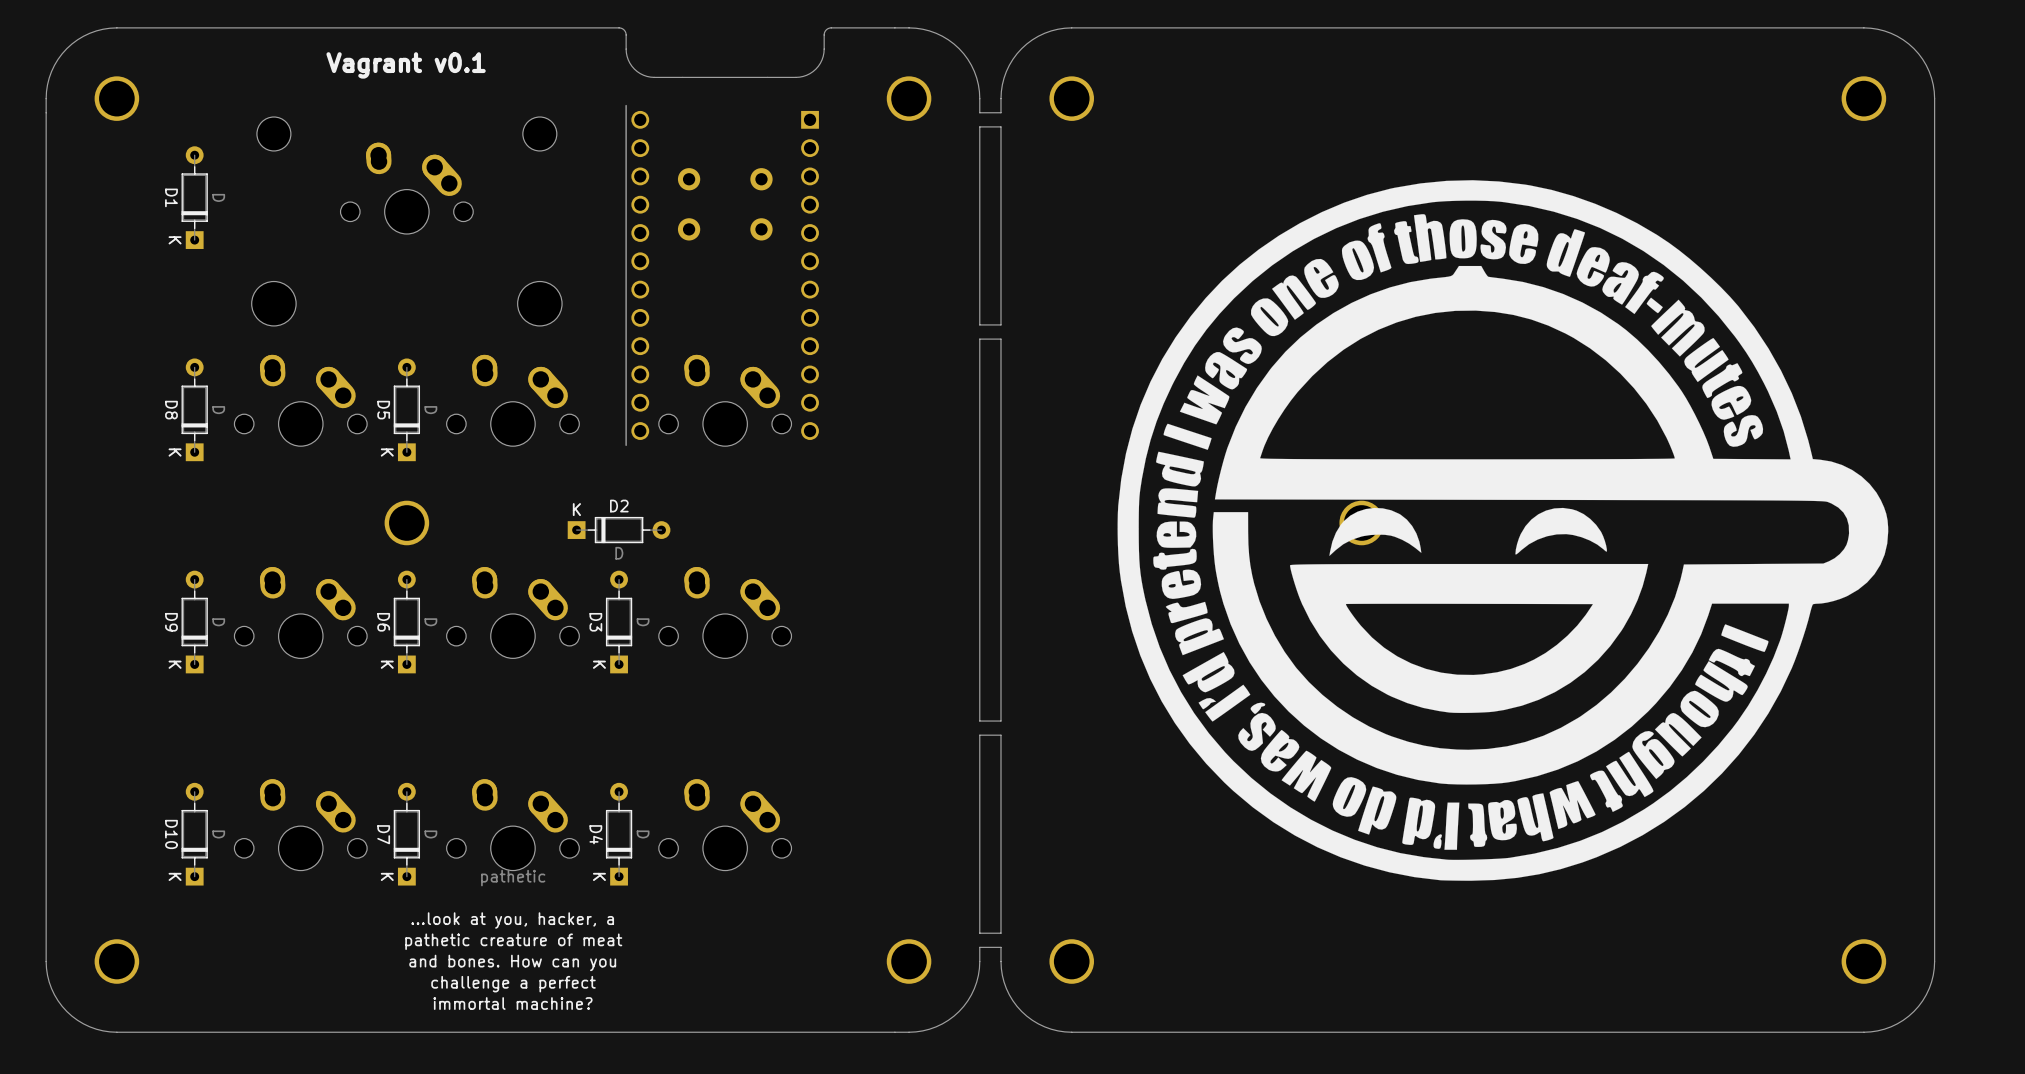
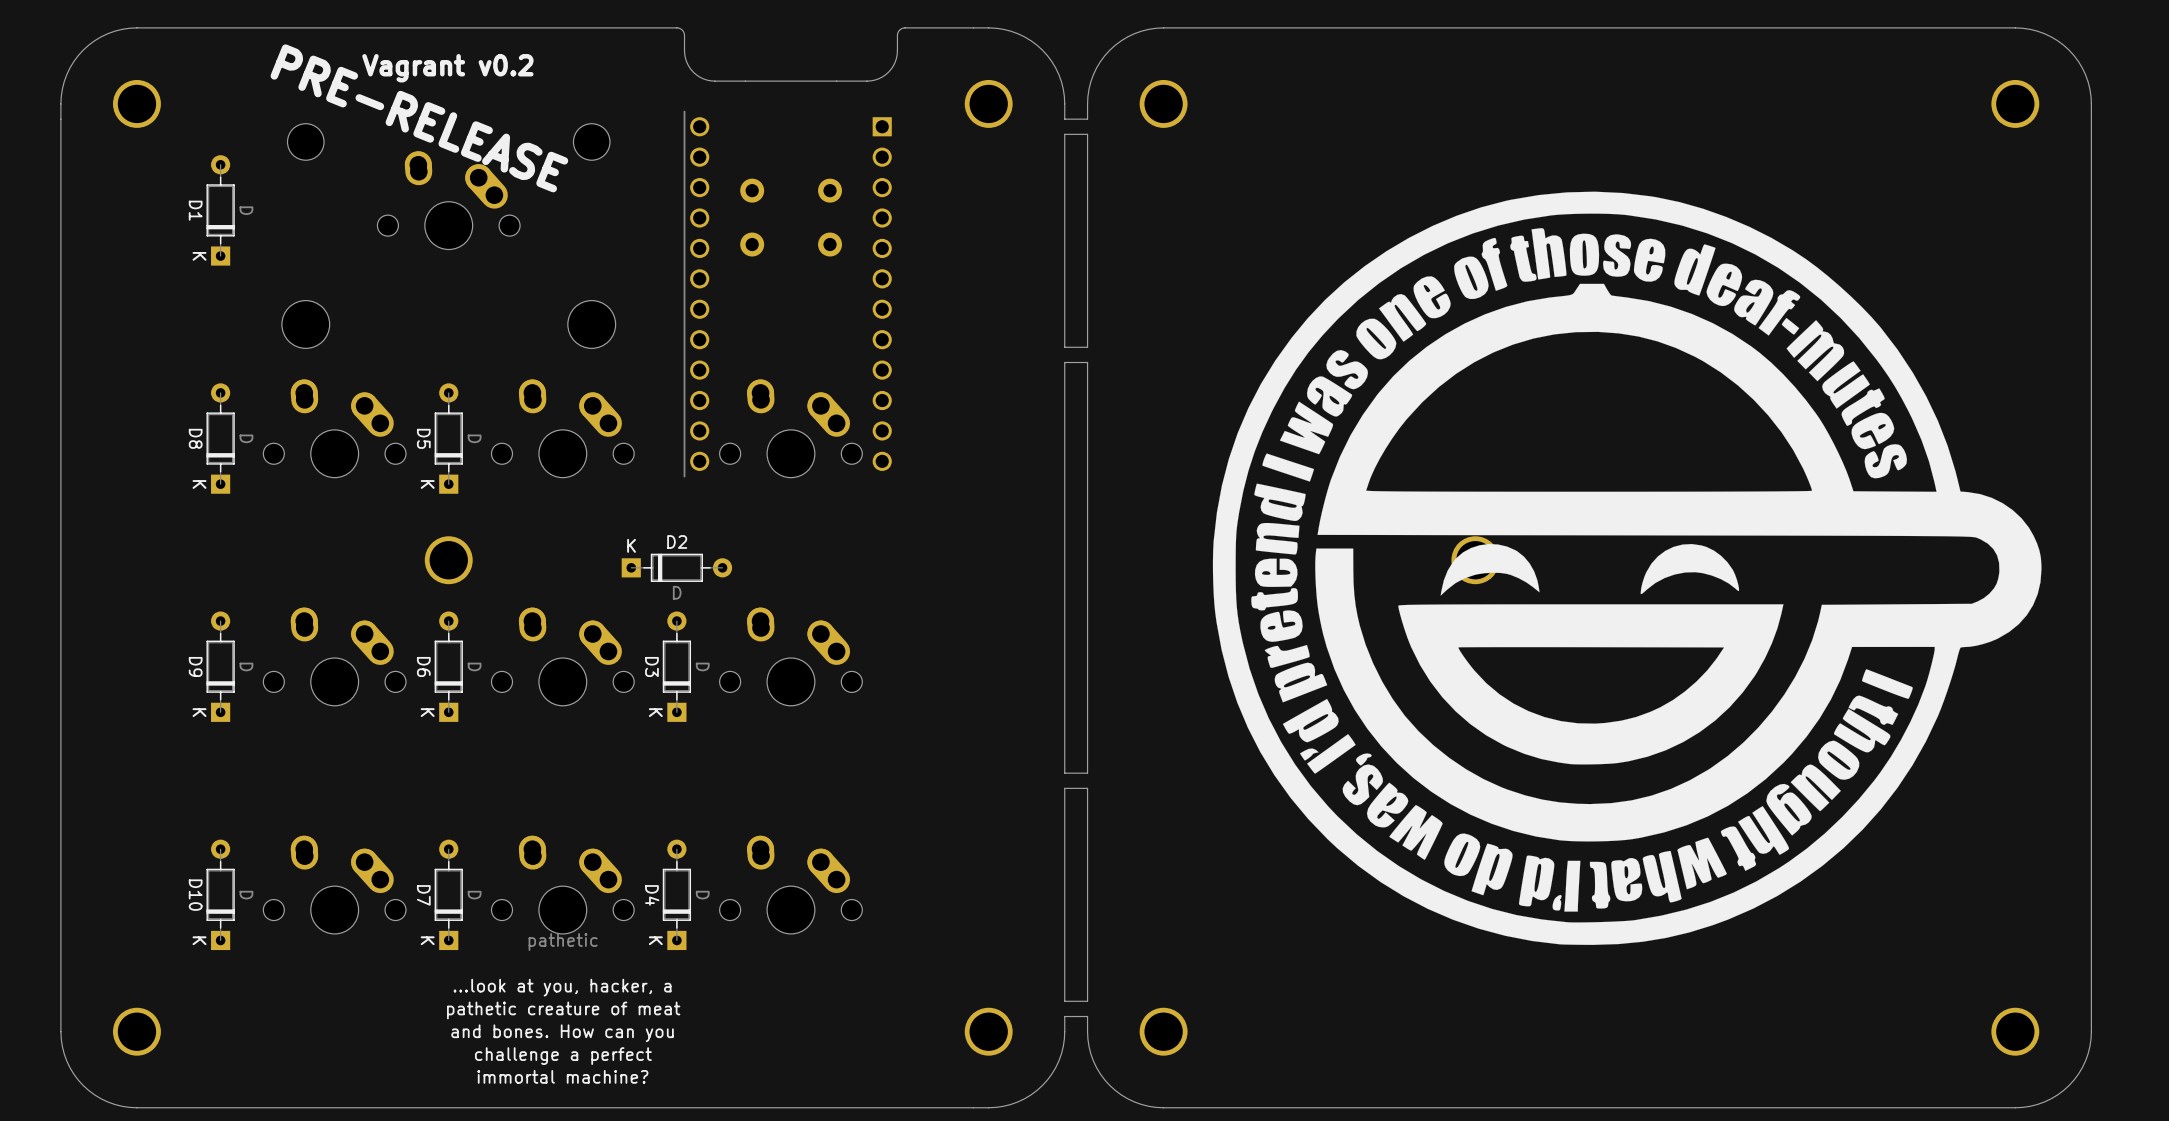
text: Vagrant v0.1 (406, 65) -> Vagrant v0.2 (447, 68)
text: none -> PRE-RELEASE (419, 118)

